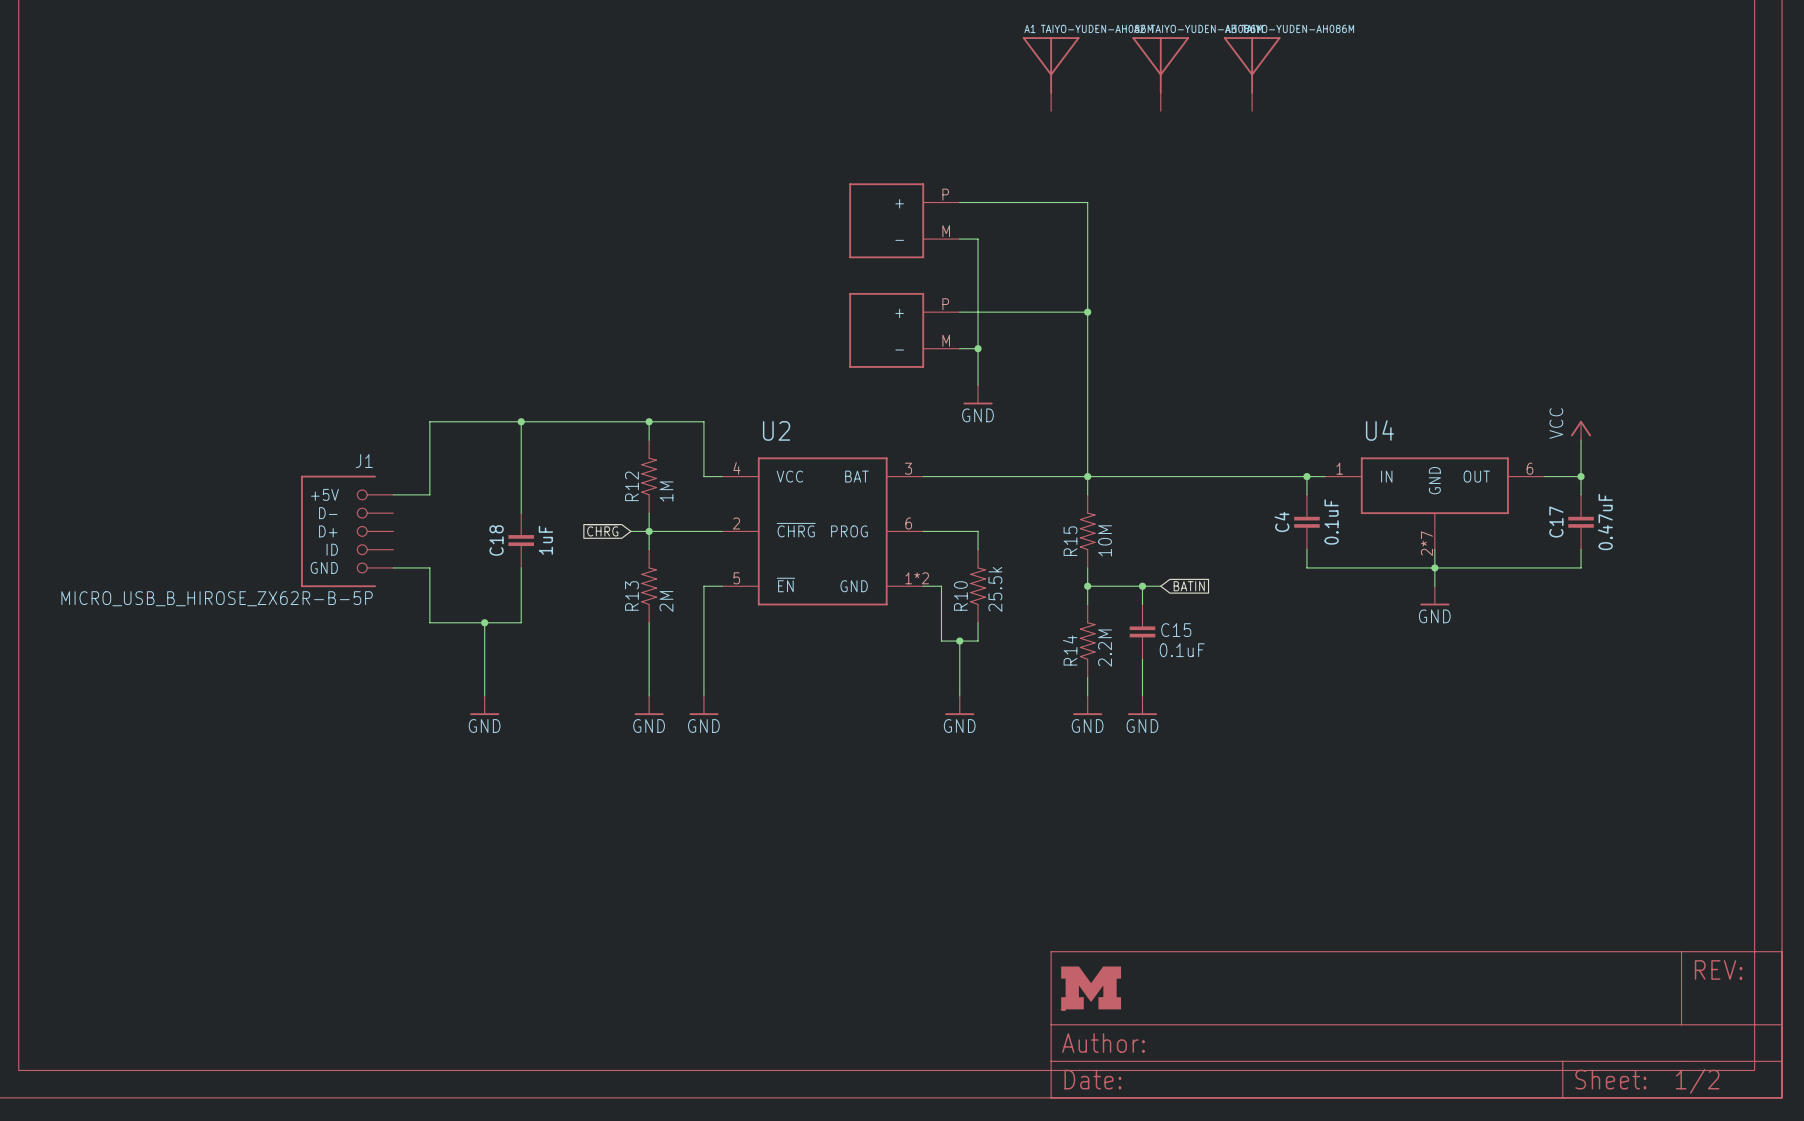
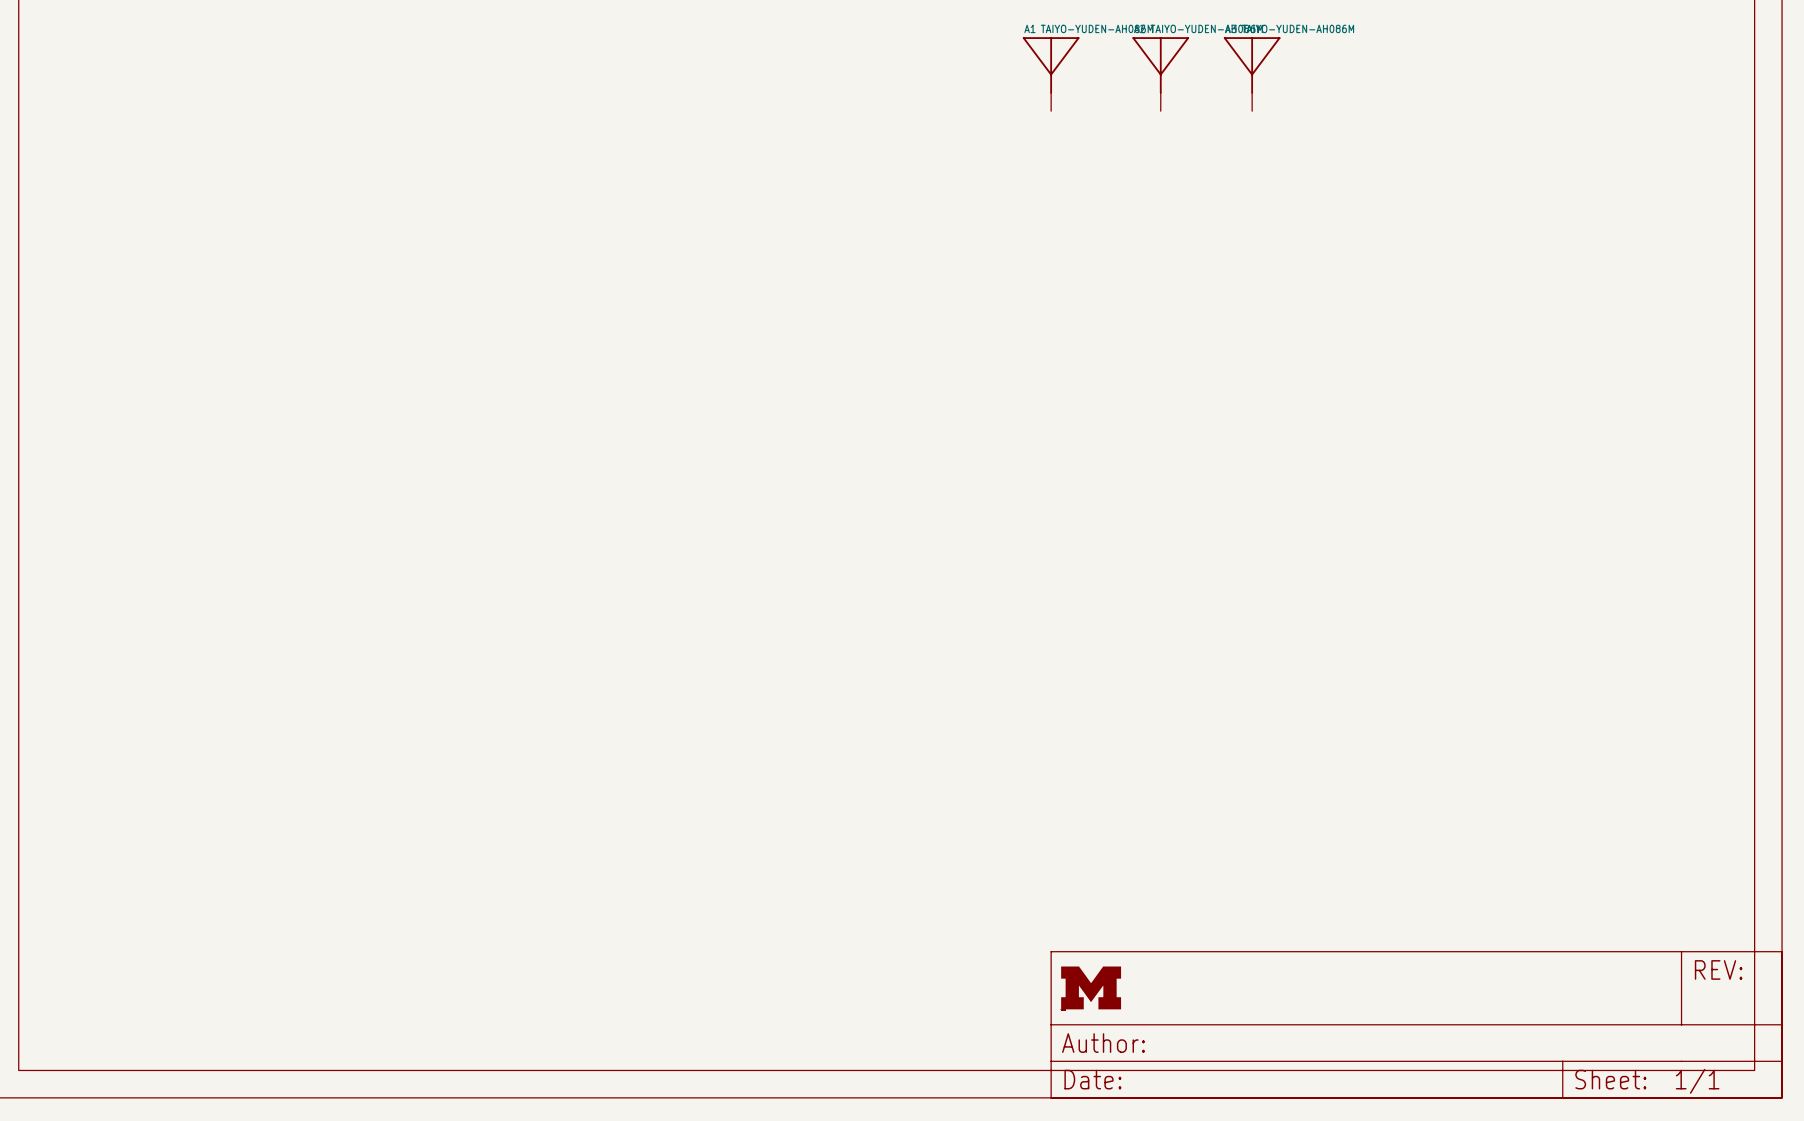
wire: (959, 202) (1087, 202) (1087, 494) -> none
part: (904, 220) -> none
wire: (959, 239) (978, 239) (978, 385) -> none
wire: (959, 312) (1087, 312) -> none
junction: (1087, 312) -> none
part: (904, 330) -> none
wire: (959, 348) (978, 348) -> none
junction: (978, 348) -> none
power symbol: GND (978, 394) -> none
wire: (521, 421) (521, 513) -> none
junction: (521, 421) -> none
wire: (649, 421) (649, 440) -> none
junction: (649, 421) -> none
power symbol: VCC (1581, 430) -> none
wire: (1581, 440) (1581, 494) -> none
R12: 1M (649, 476) -> none
wire: (722, 476) (703, 476) (703, 421) (429, 421) (429, 494) (393, 494) -> none
wire: (923, 476) (1325, 476) -> none
junction: (1087, 476) -> none
wire: (1306, 476) (1306, 494) -> none
junction: (1306, 476) -> none
wire: (1544, 476) (1581, 476) -> none
junction: (1581, 476) -> none
U4: (1434, 503) -> none
wire: (649, 513) (649, 549) -> none
C4: 0.1uF (1306, 522) -> none
C17: 0.47uF (1581, 522) -> none
global label: ~{CHRG} (602, 530) -> none
J1: MICRO_USB_B_HIROSE_ZX62R-B-5P (347, 531) -> none
wire: (630, 531) (722, 531) -> none
junction: (649, 531) -> none
U2: (822, 531) -> none
wire: (923, 531) (978, 531) (978, 549) -> none
R15: 10M (1087, 531) -> none
C18: 1uF (521, 540) -> none
wire: (1306, 549) (1306, 567) (1581, 567) (1581, 549) -> none
wire: (1434, 549) (1434, 586) -> none
wire: (393, 567) (429, 567) (429, 622) (521, 622) (521, 567) -> none
wire: (1087, 567) (1087, 604) -> none
junction: (1434, 567) -> none
R13: 2M (649, 586) -> none
wire: (722, 586) (703, 586) (703, 695) -> none
wire: (923, 586) (941, 586) (941, 641) (978, 641) (978, 622) -> none
R10: 25.5k (978, 586) -> none
wire: (1087, 586) (1160, 586) -> none
junction: (1087, 586) -> none
wire: (1142, 586) (1142, 604) -> none
junction: (1142, 586) -> none
global label: BATIN (1189, 586) -> none
power symbol: GND (1434, 595) -> none
wire: (484, 622) (484, 695) -> none
junction: (484, 622) -> none
wire: (649, 622) (649, 695) -> none
C15: 0.1uF (1142, 631) -> none
wire: (959, 641) (959, 695) -> none
junction: (959, 641) -> none
R14: 2.2M (1087, 641) -> none
wire: (1142, 659) (1142, 695) -> none
wire: (1087, 677) (1087, 695) -> none
power symbol: GND (484, 705) -> none
power symbol: GND (649, 705) -> none
power symbol: GND (703, 705) -> none
power symbol: GND (959, 705) -> none
power symbol: GND (1087, 705) -> none
power symbol: GND (1142, 705) -> none
part text: 1/2 (1697, 1081) -> 1/1 (1697, 1081)

